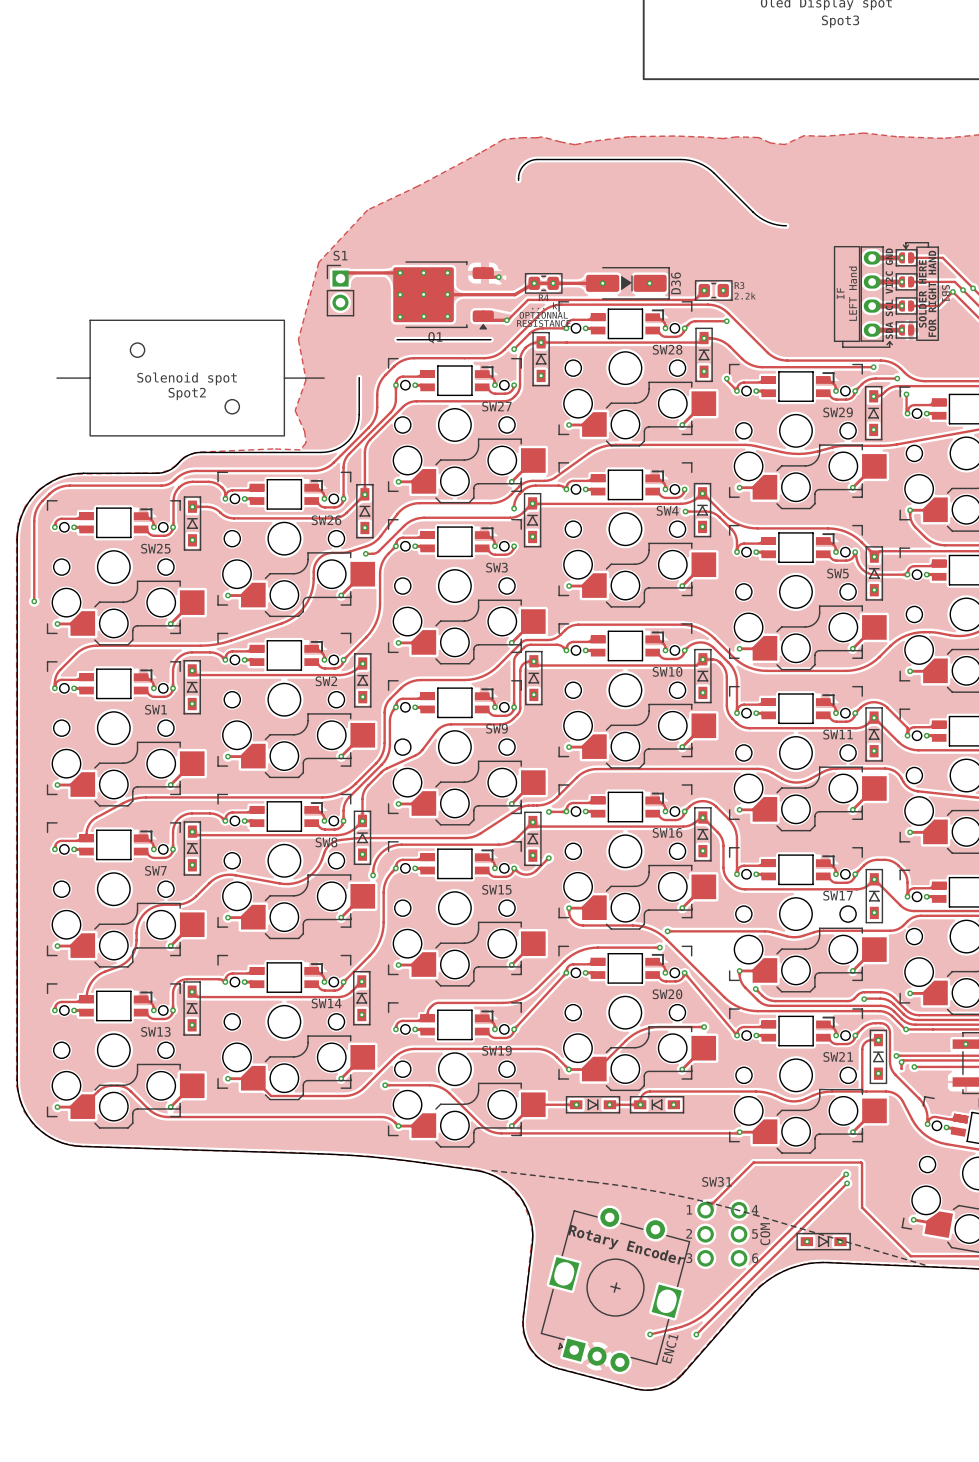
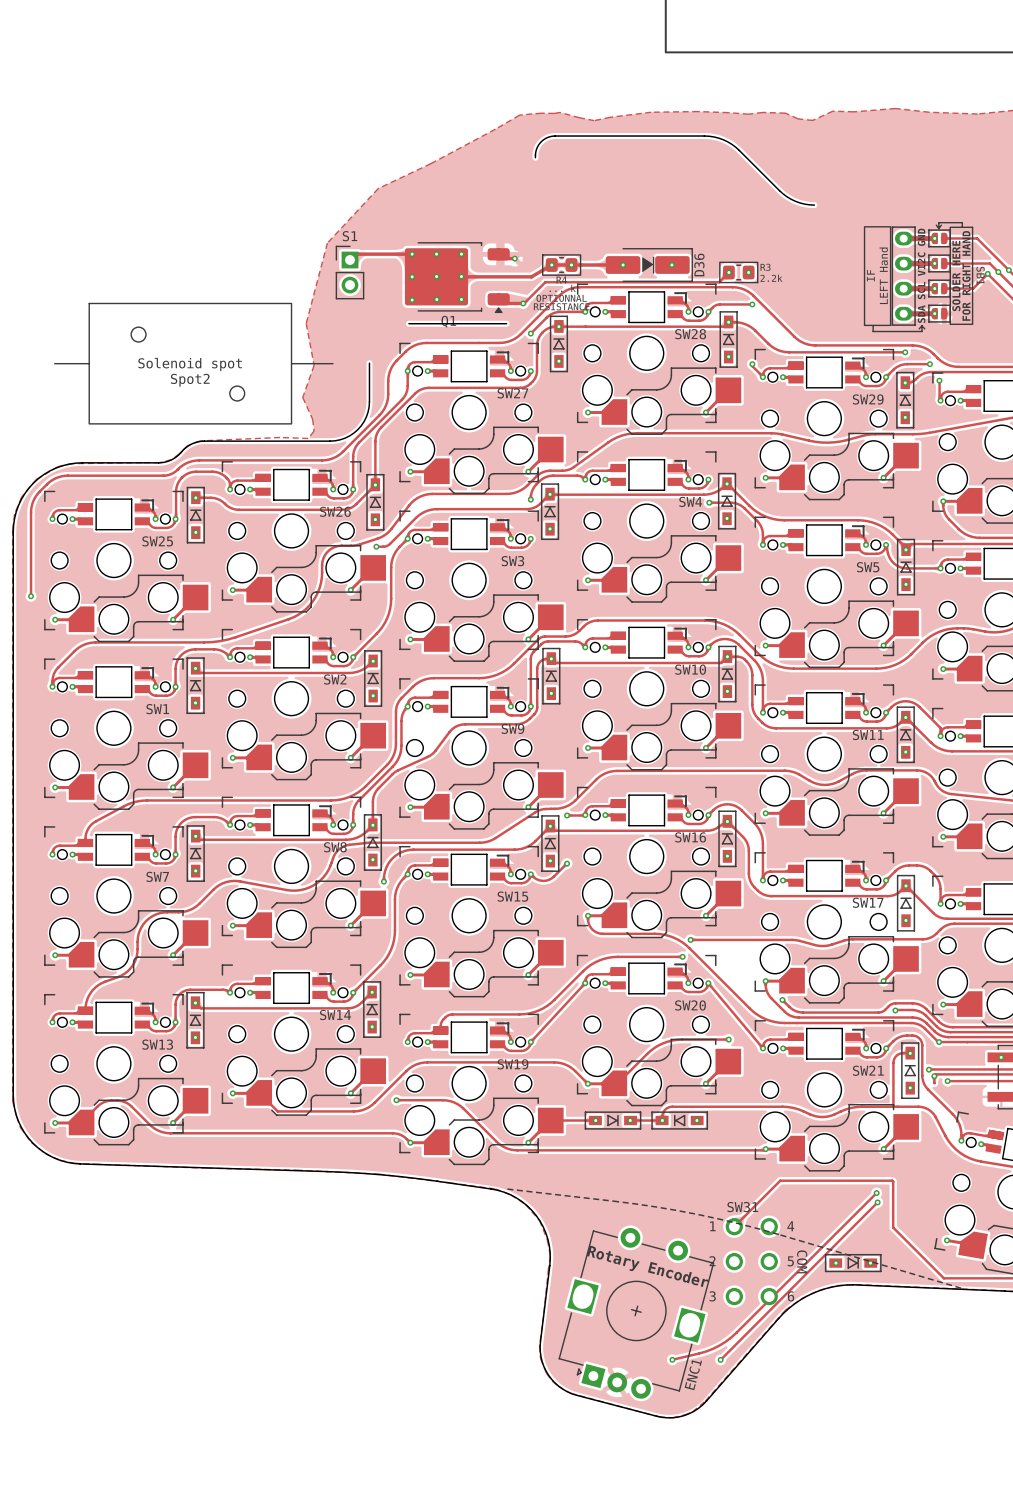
SW31 footprint: [697, 1201, 748, 1267] -> [725, 1218, 778, 1306]

